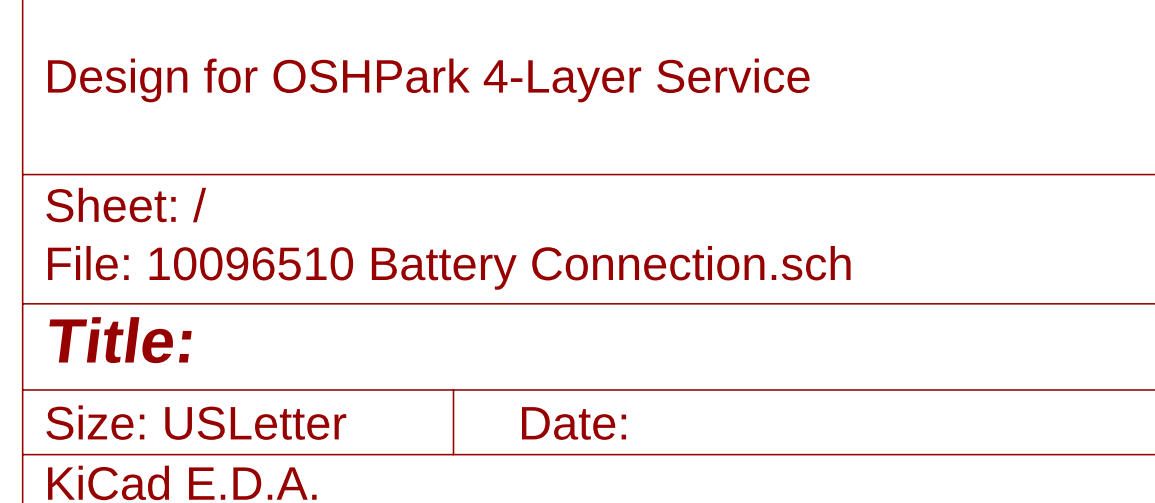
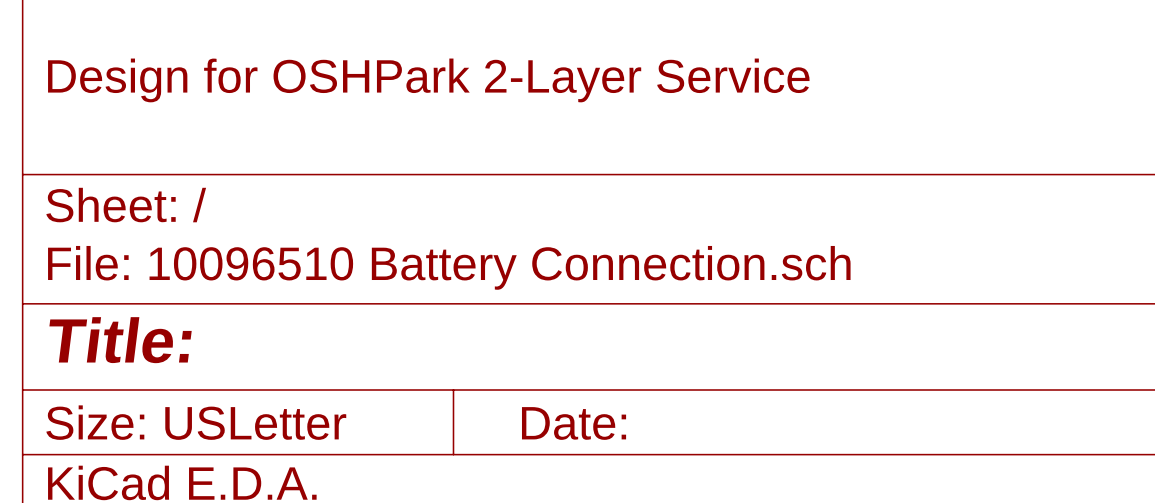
title block: Design for OSHPark 4-Layer Service (428, 80) -> Design for OSHPark 2-Layer Service (428, 80)

